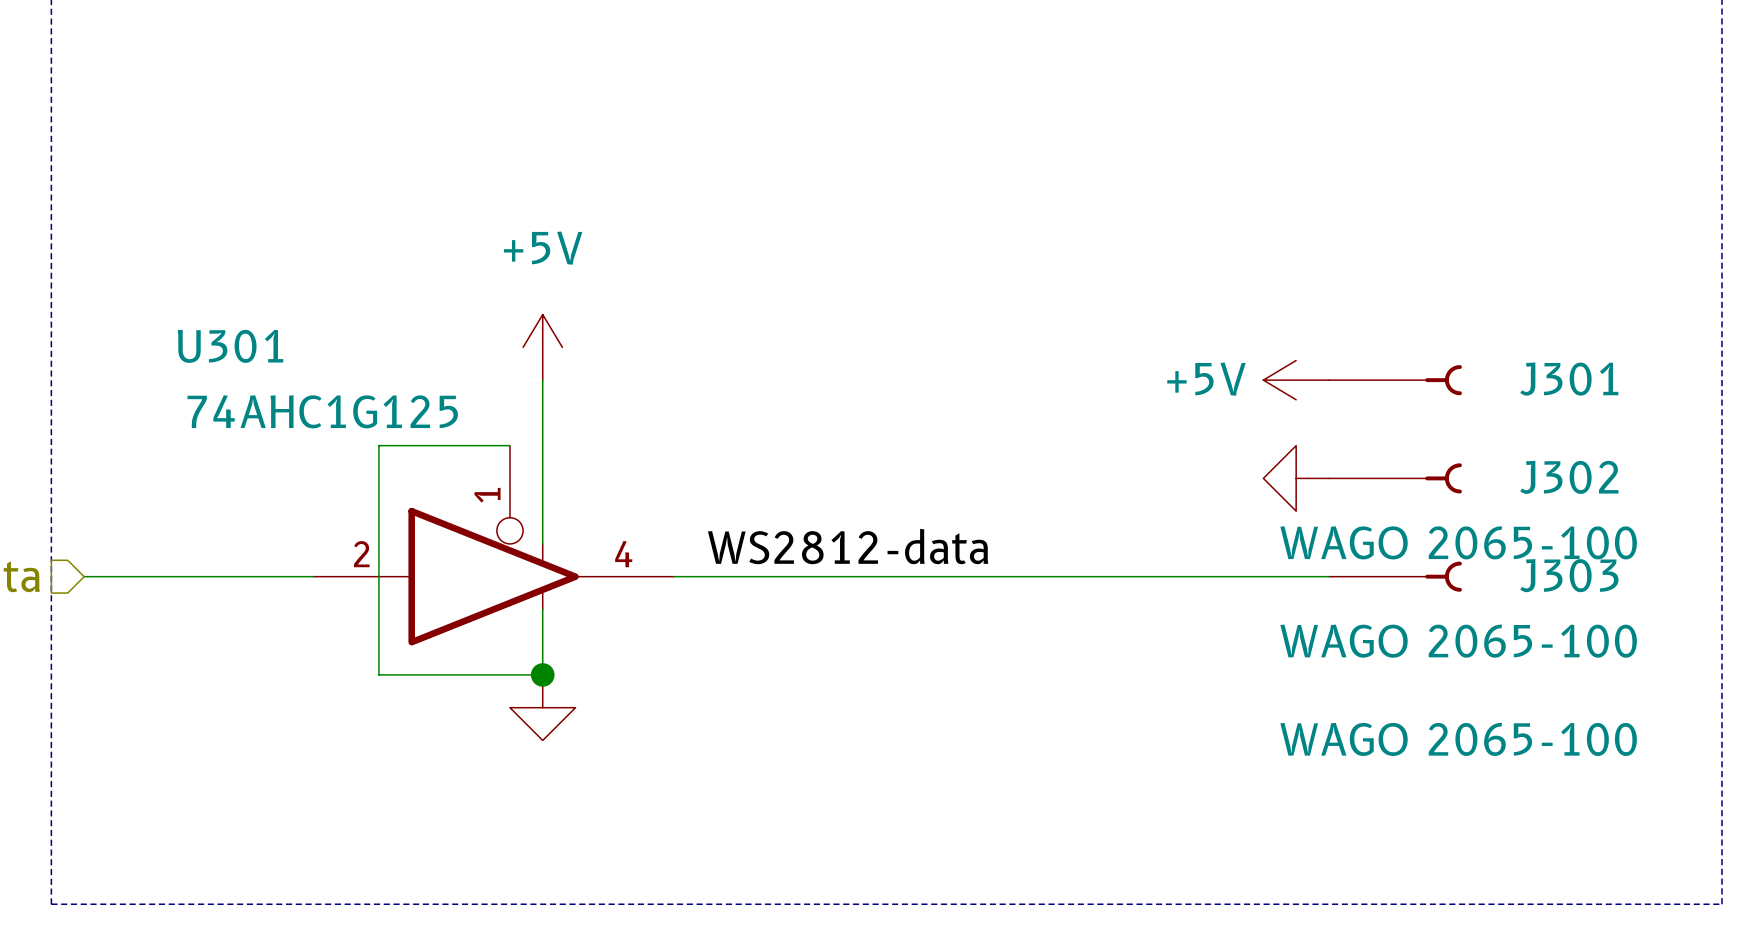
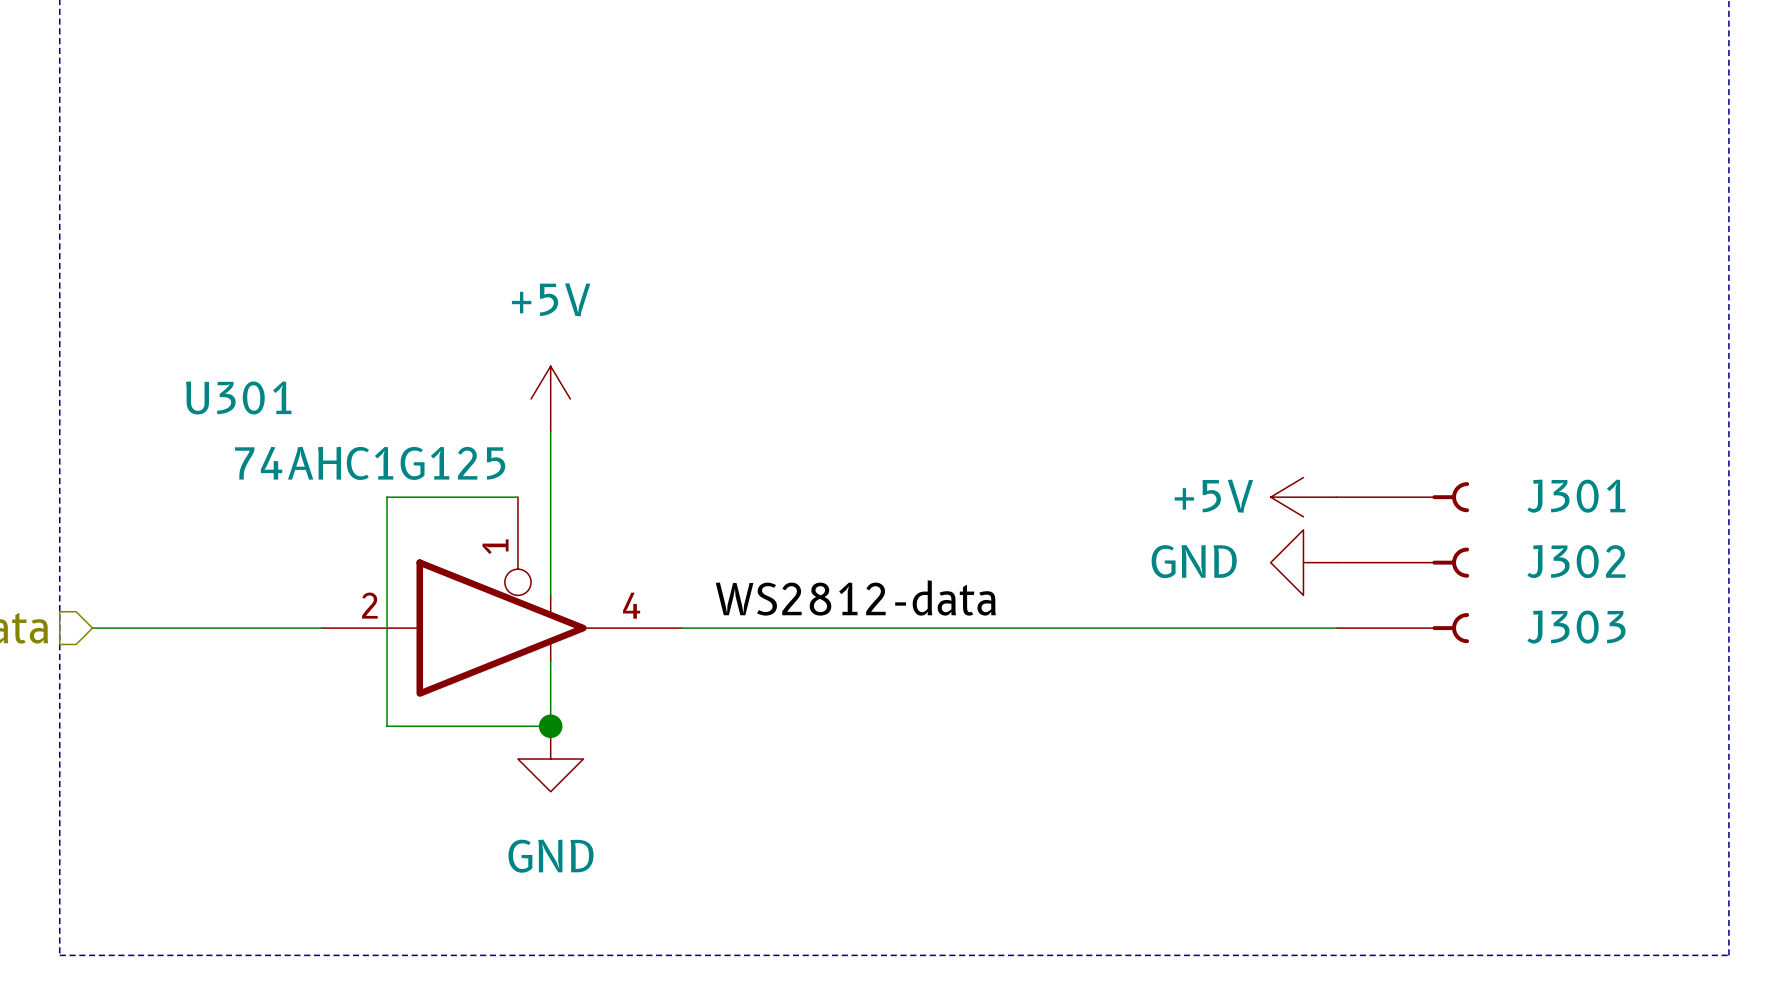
power symbol position: +5V (1296, 380) -> +5V (1303, 497)
J301 position: (1395, 380) -> (1402, 497)
U301 value position: 74AHC1G125 (322, 411) -> 74AHC1G125 (370, 463)
power symbol: (1296, 478) -> none
J302 position: (1395, 478) -> (1402, 562)
power symbol: none -> GND (1303, 562)
J301 value: WAGO 2065-100 (1458, 542) -> none
J302 value: WAGO 2065-100 (1458, 641) -> none
J303 value: WAGO 2065-100 (1458, 739) -> none
power symbol text: none -> GND (550, 856)

